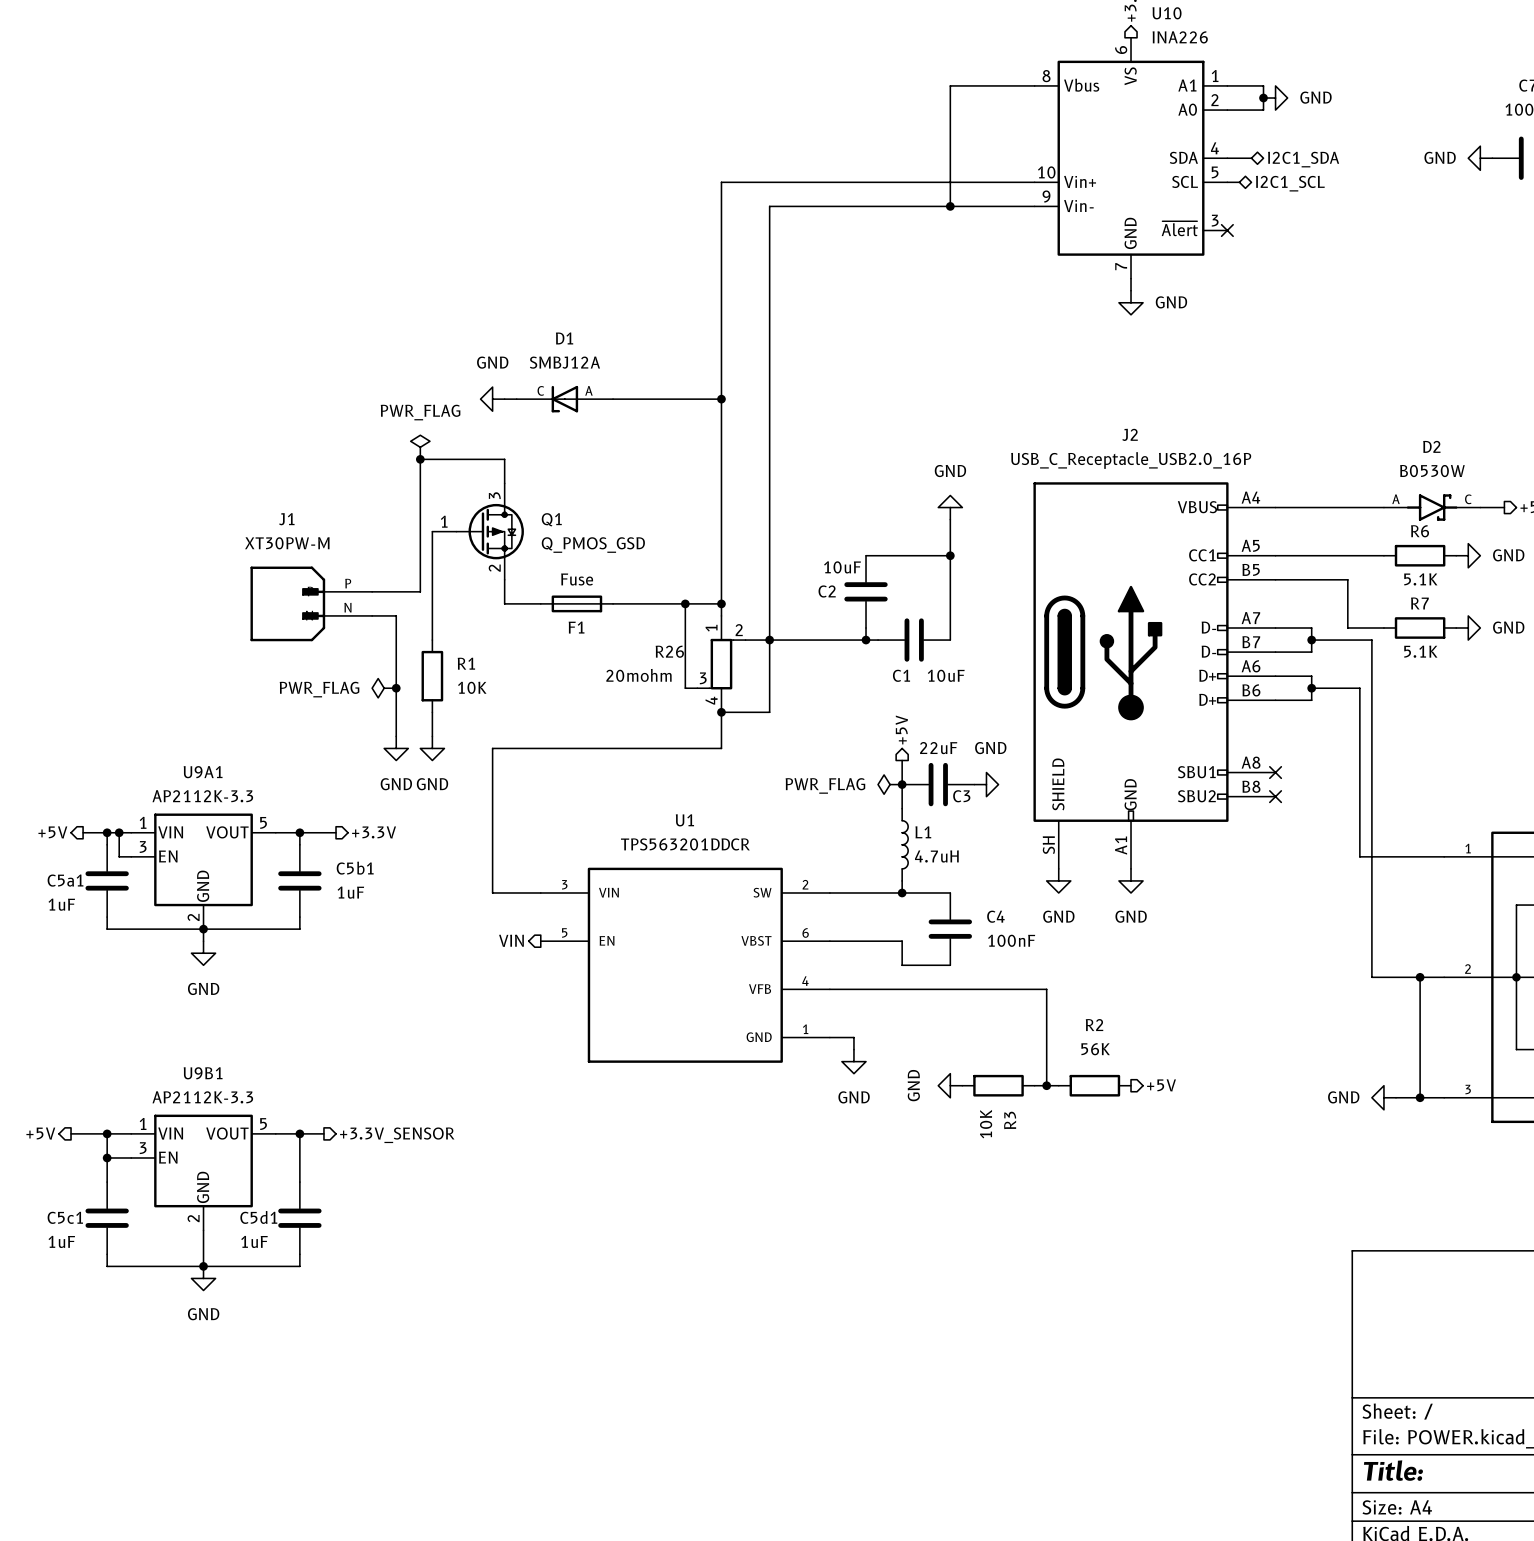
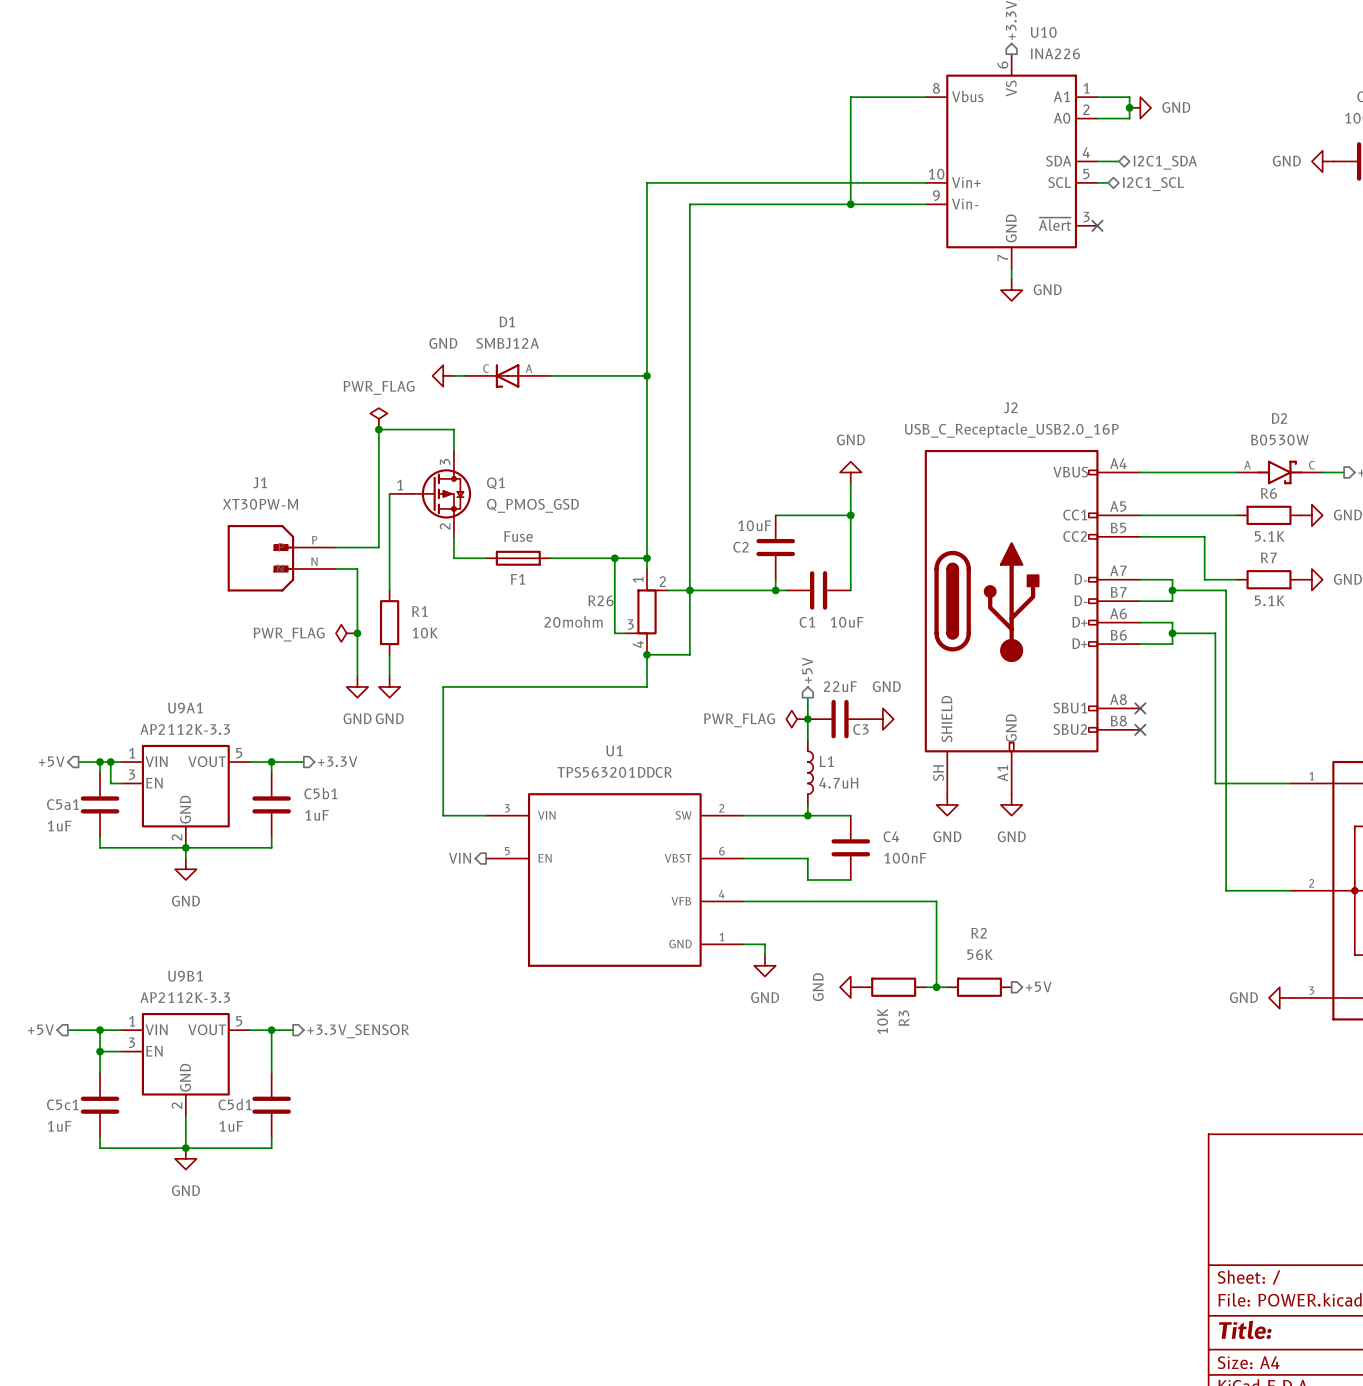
wire: (1420, 977) (1420, 1097) -> none
junction: (1420, 977) -> none
power symbol position: GND (1383, 1097) -> GND (1279, 997)
wire: (1396, 1097) (1444, 1097) -> none
junction: (1420, 1097) -> none

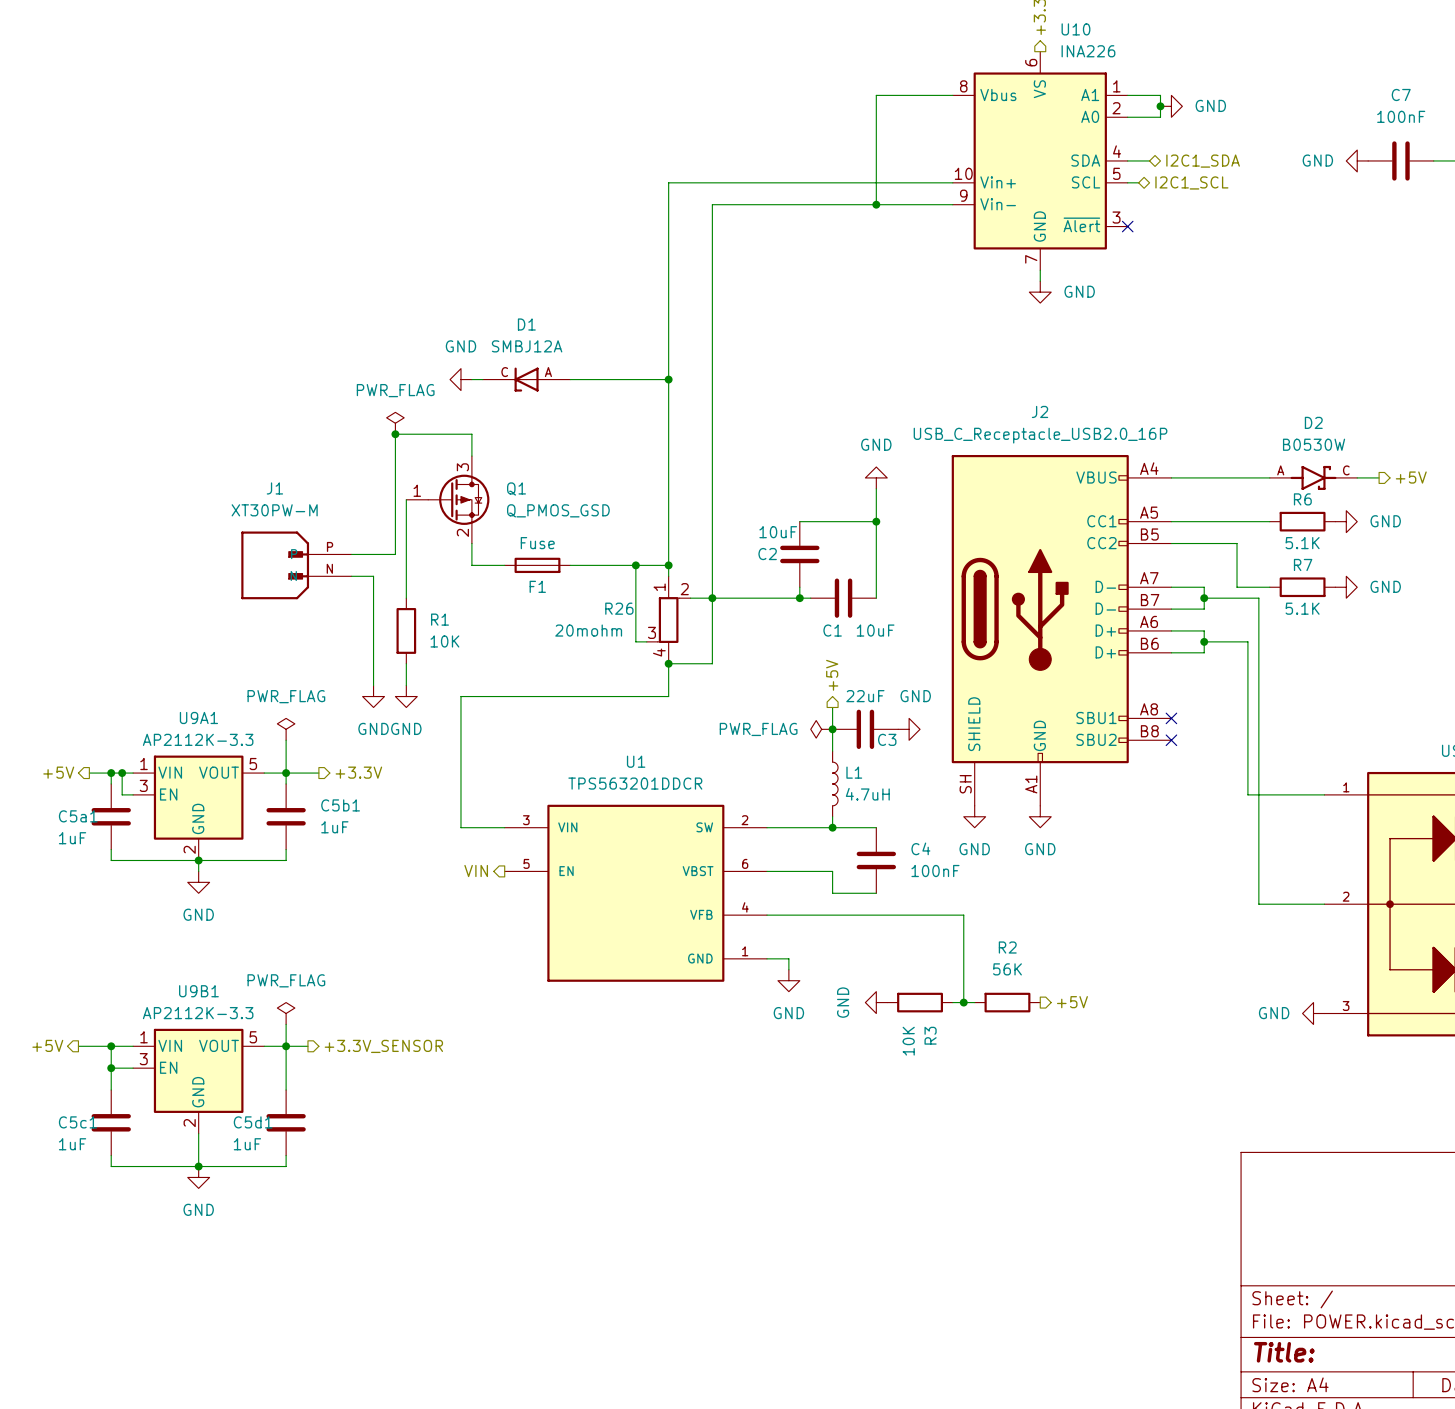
power symbol rotation: 0° (346, 633) -> 90° clockwise (286, 729)
power symbol position: PWR_FLAG (346, 633) -> PWR_FLAG (286, 729)
junction: (357, 633) -> none
power symbol text position: PWR_FLAG (289, 634) -> PWR_FLAG (286, 696)
wire: none -> (286, 740) (286, 773)
power symbol: none -> PWR_FLAG (286, 1013)
wire: none -> (286, 1024) (286, 1046)

